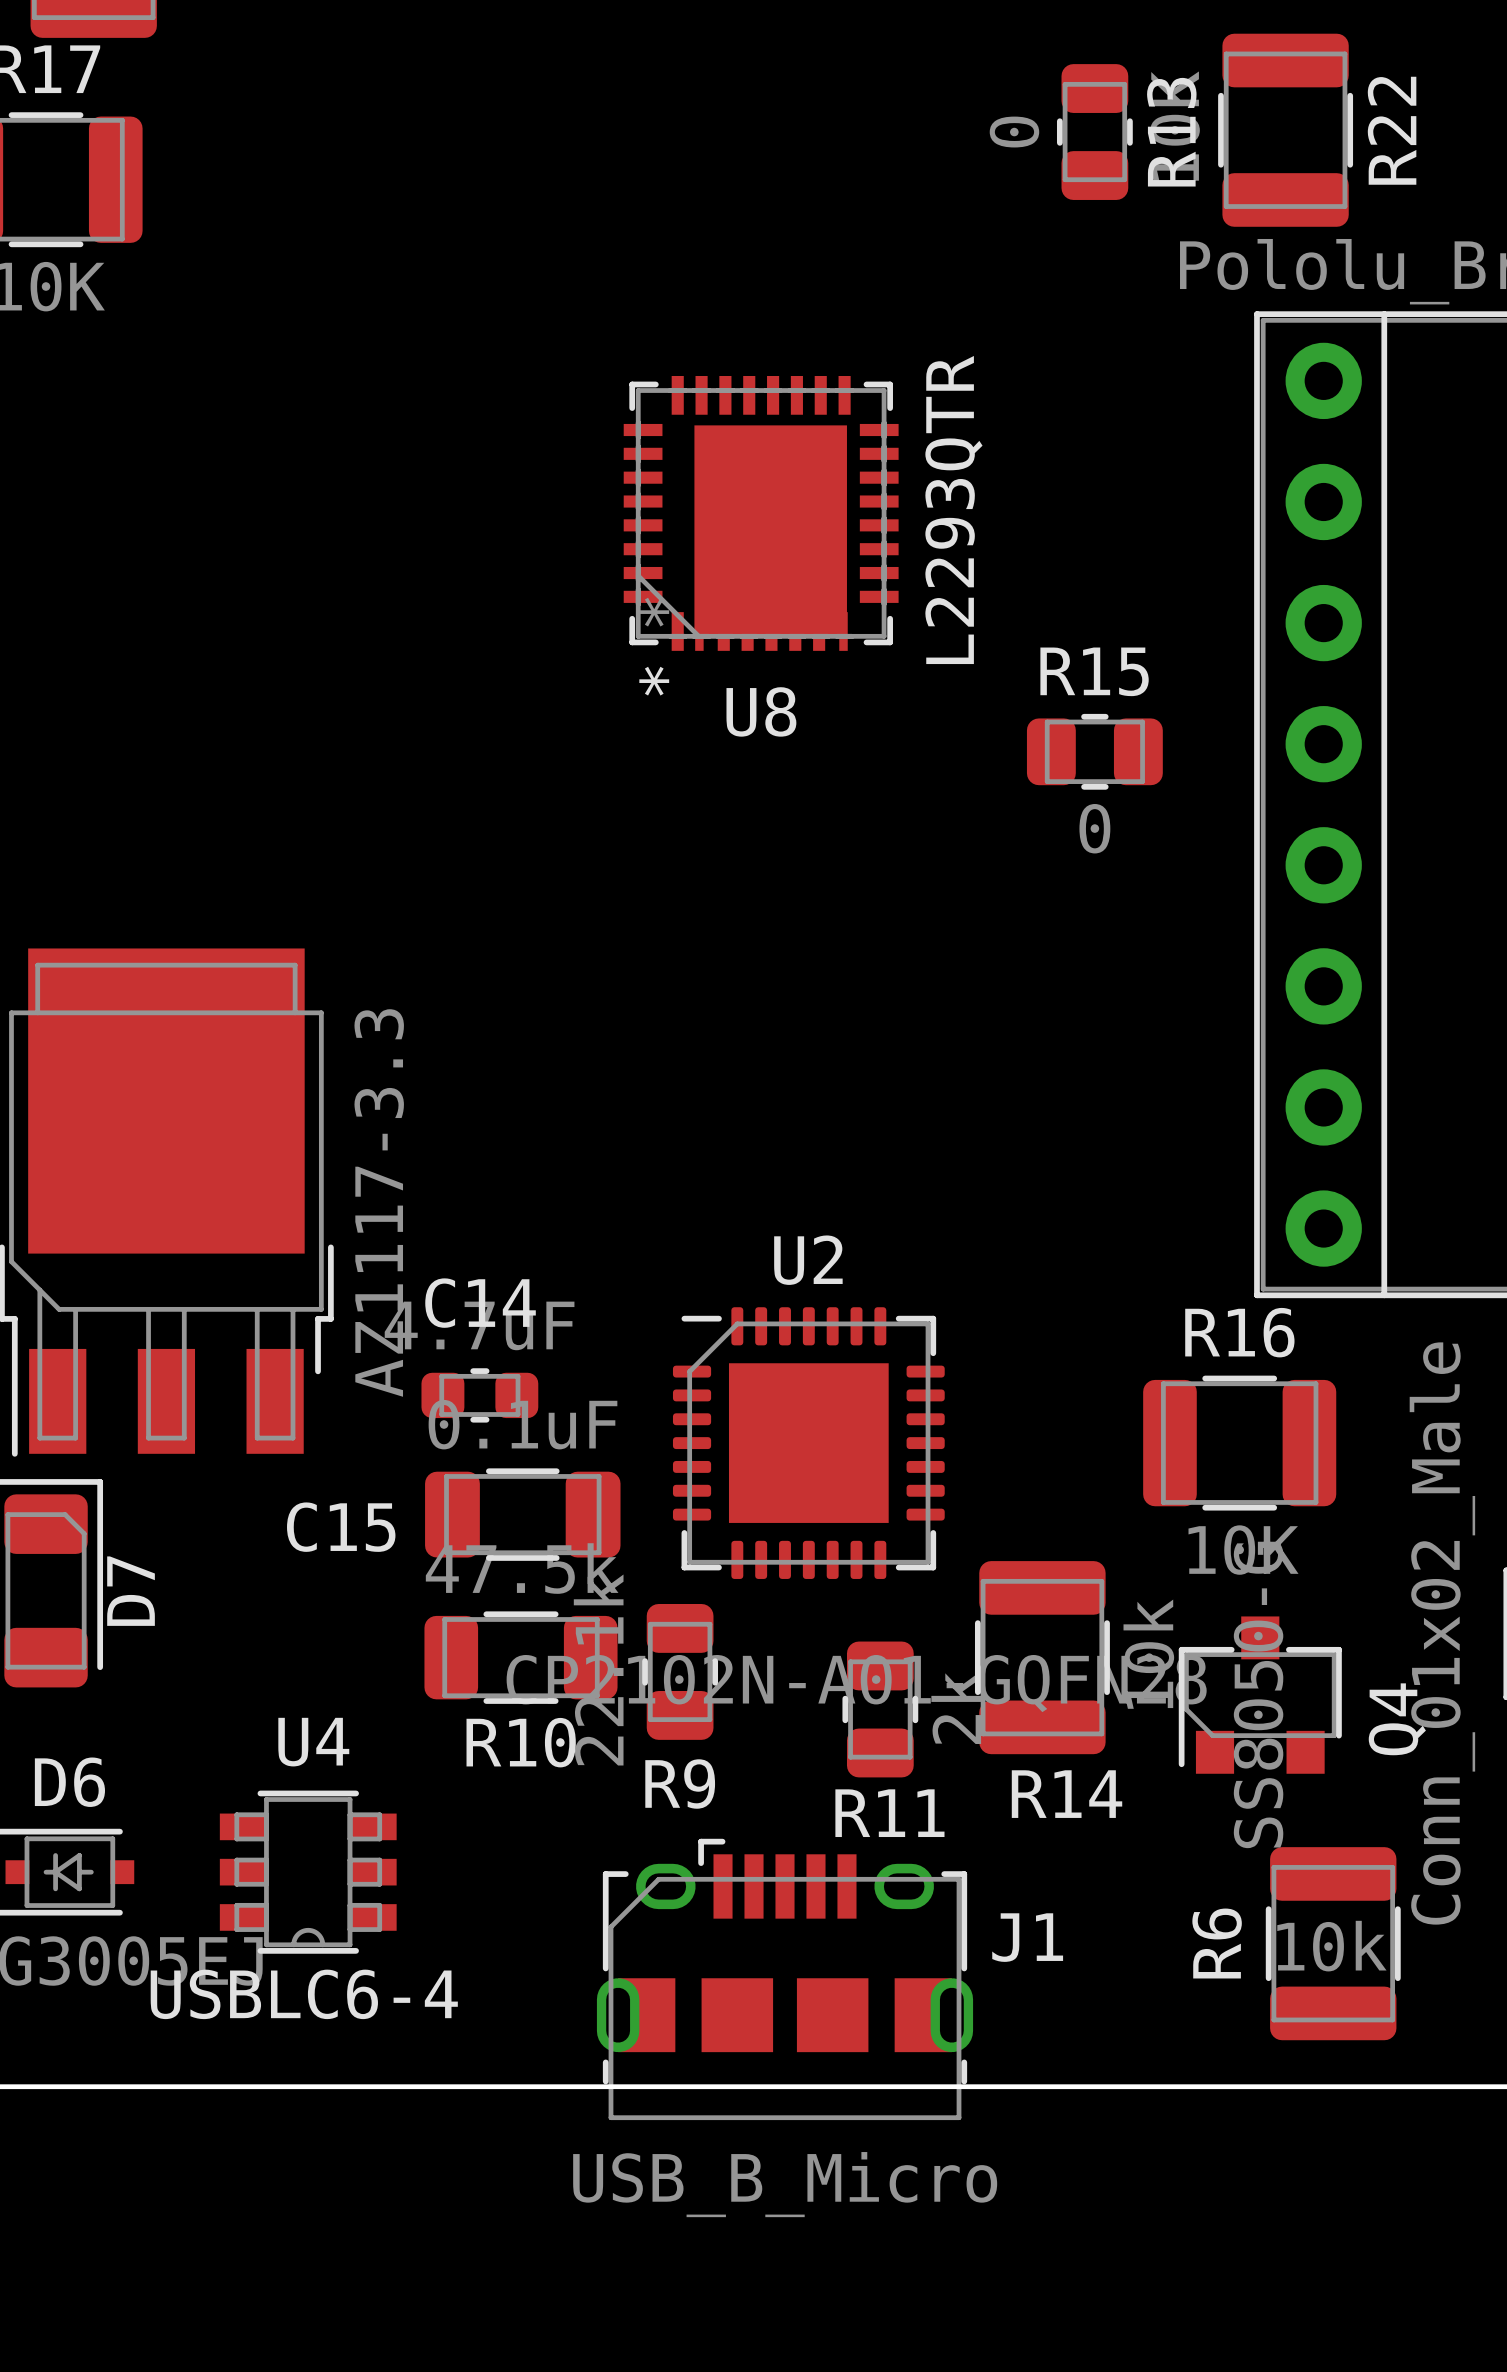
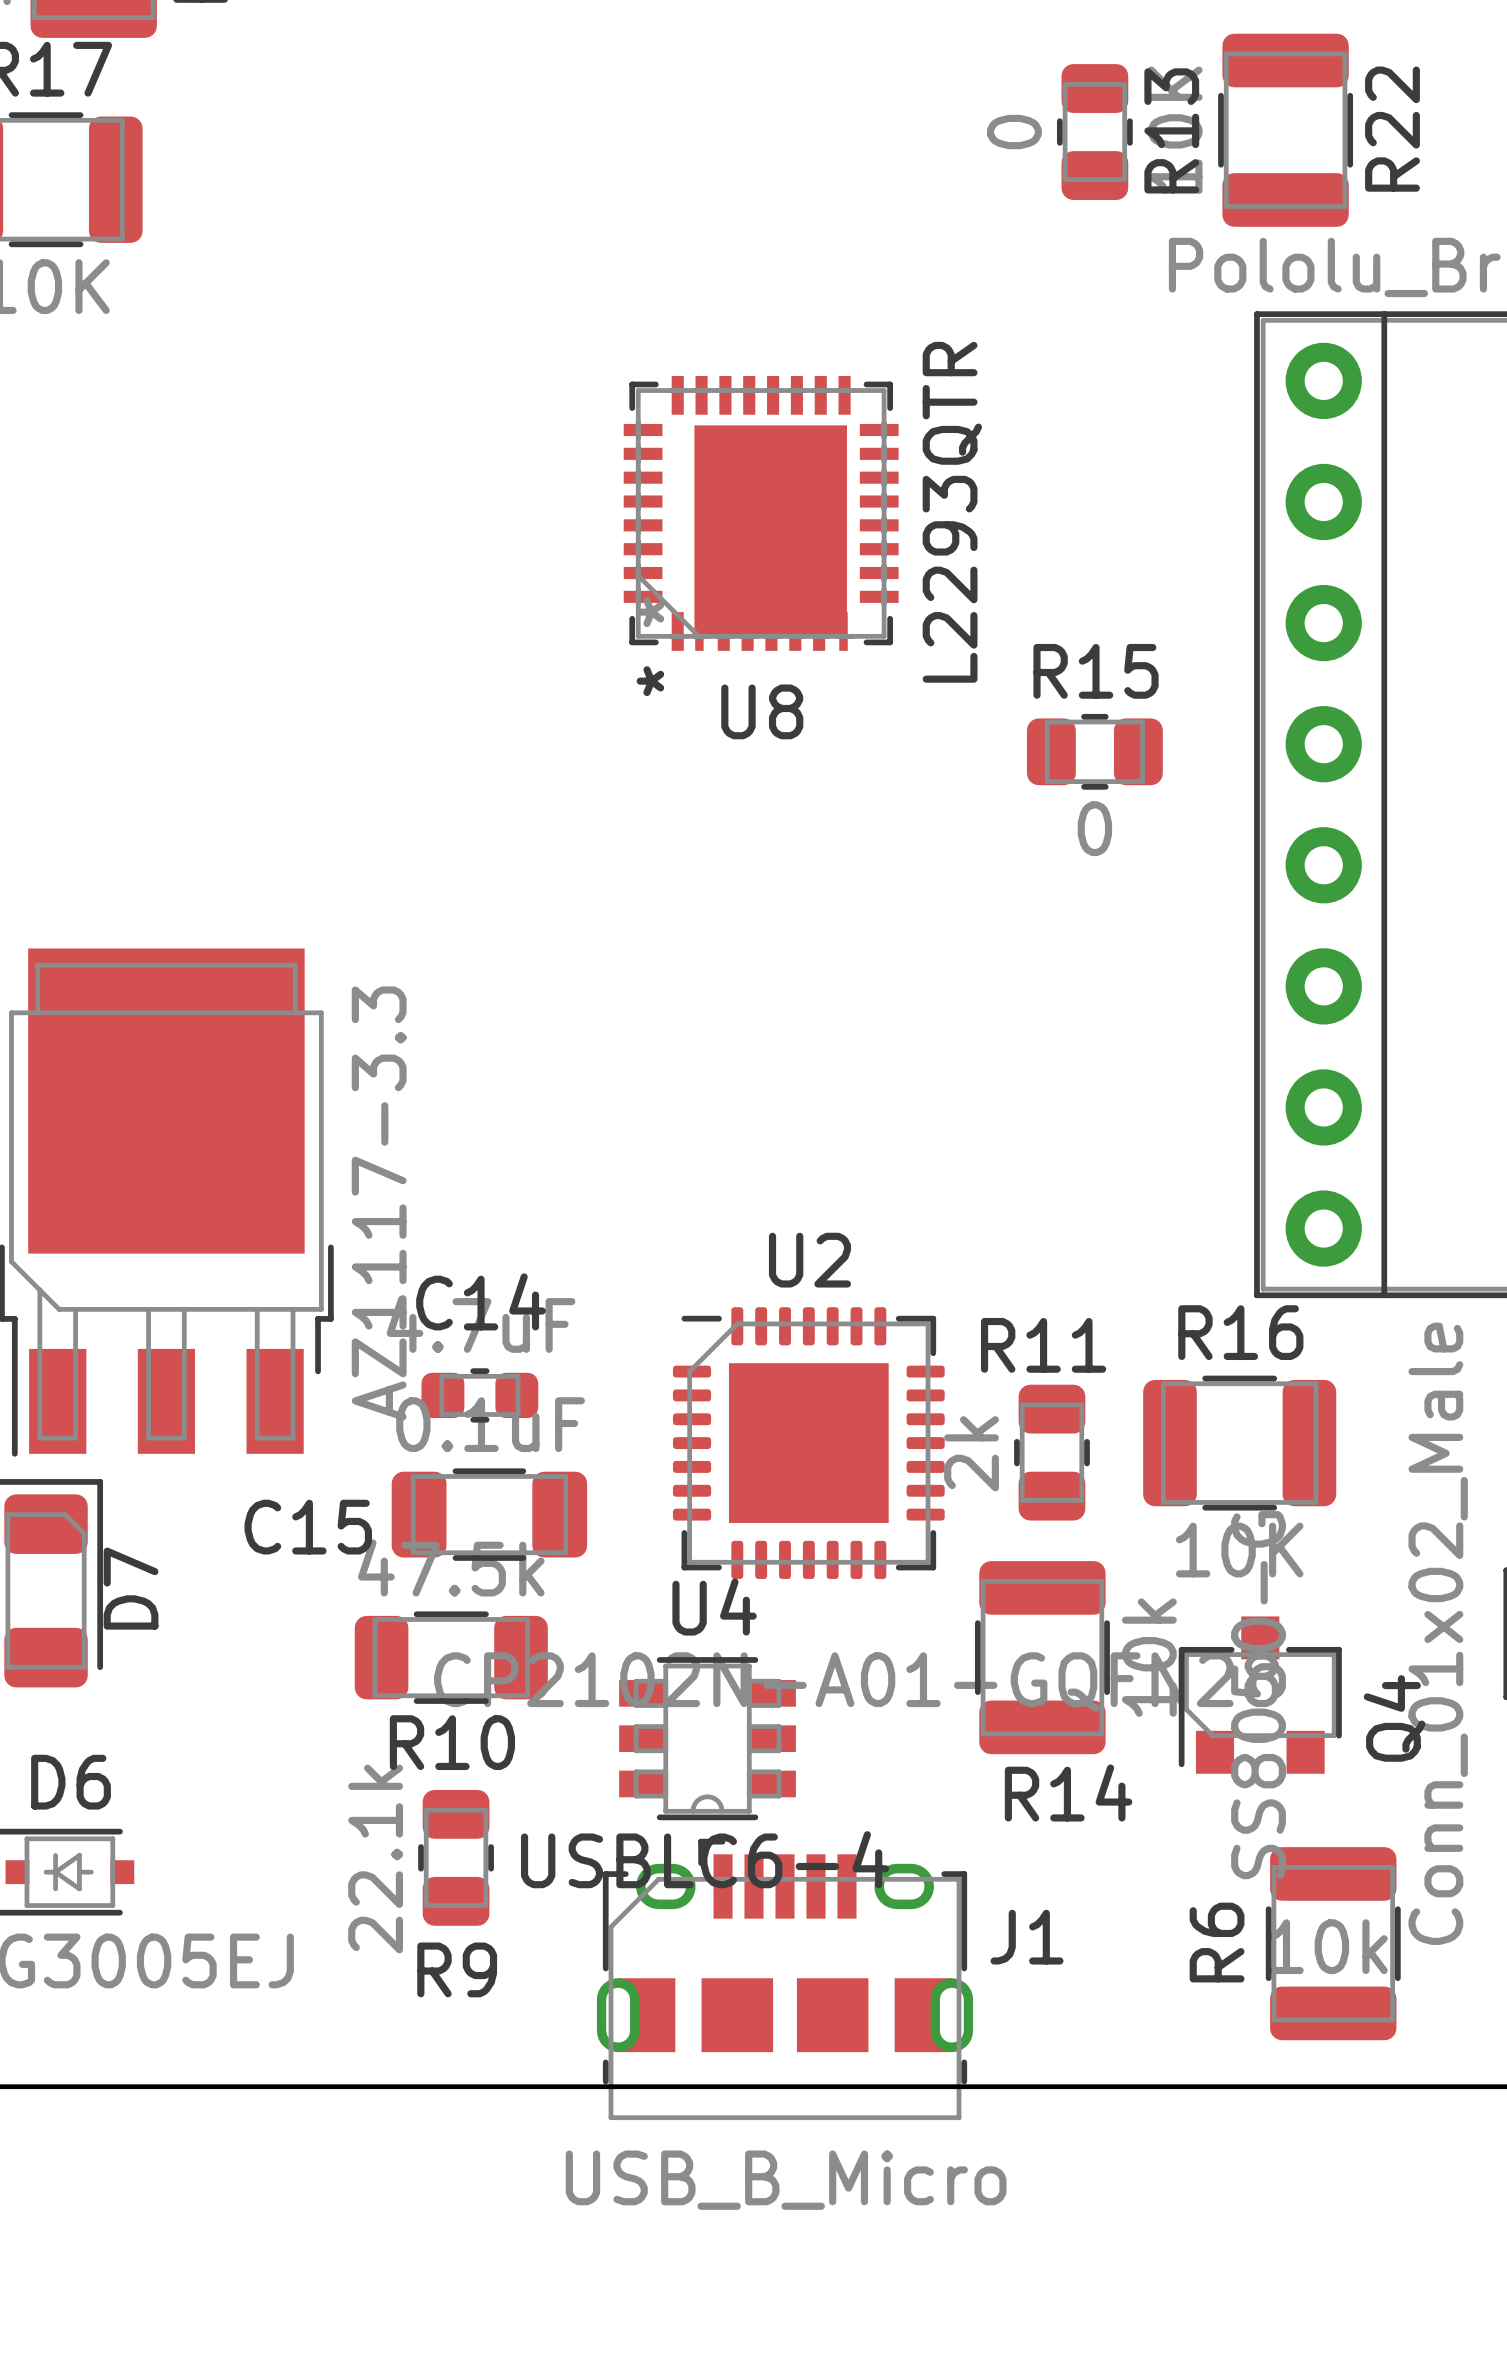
C15 position: (522, 1514) -> (489, 1514)
R10 position: (521, 1657) -> (451, 1657)
R9 position: (680, 1671) -> (456, 1857)
R11 value position: 2k (956, 1707) -> 2k (971, 1453)
R11 position: (880, 1709) -> (1051, 1452)
R11 name position: R11 (889, 1813) -> R11 (1043, 1345)
U4 position: (308, 1872) -> (707, 1738)

